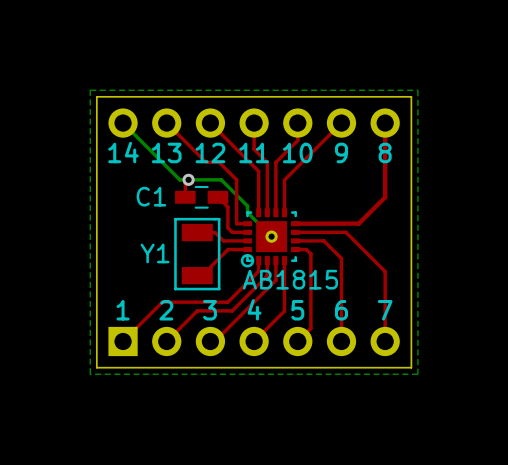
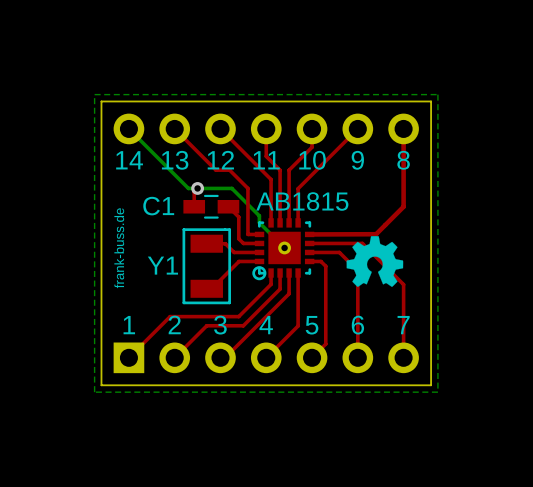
drawing: none -> [346, 236, 404, 287]
text: none -> frank-buss.de (119, 248)
part value position: AB1815 (290, 279) -> AB1815 (302, 201)

